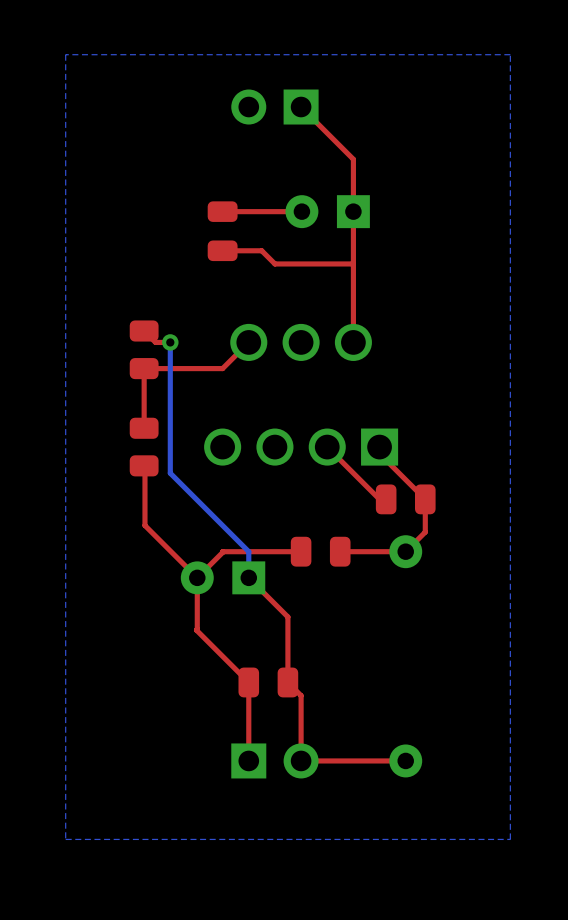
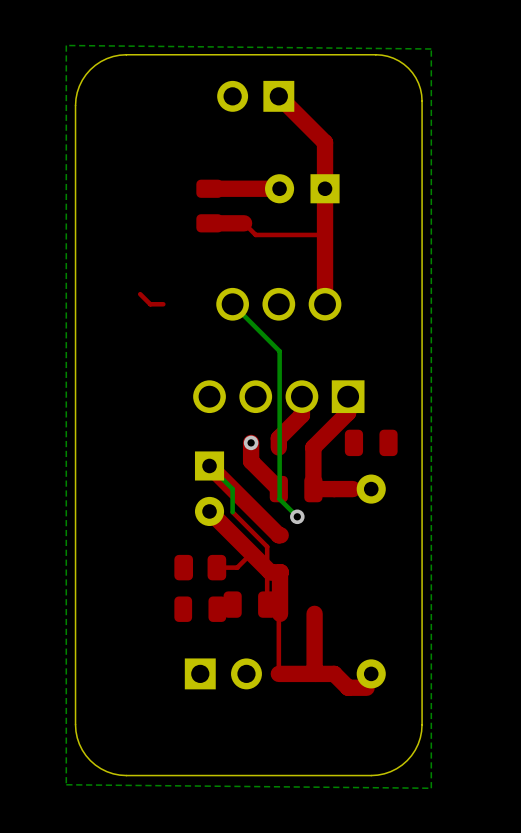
bottom zone outline: (510, 54) (510, 839) (65, 839) (65, 54) (510, 54) -> (66, 45) (431, 48) (431, 788) (66, 784) (66, 45)
board edge: none -> (375, 54) (119, 55) (106, 58) (95, 65) (86, 74) (79, 86) (75, 105) (75, 724) (77, 737) (82, 750) (90, 760) (106, 771) (126, 775) (377, 775) (390, 771) (402, 765) (411, 755) (418, 744) (422, 724) (422, 100) (418, 83) (408, 68) (393, 58) (375, 54)
top track width: thin (301, 107) (353, 159) (353, 342) -> thick (278, 96) (325, 142) (325, 304)
top track width: thin (301, 211) (222, 211) -> thick (279, 188) (209, 188)
top track width: thin (261, 250) (222, 250) -> thick (244, 223) (209, 223)
bottom track: (170, 342) (170, 473) (222, 525) -> none
via: (170, 342) -> none
top track: (248, 342) (222, 368) (144, 368) (144, 428) -> none
bottom track: none -> (232, 304) (279, 351) (279, 499) (297, 516)
part: (144, 349) -> none
part: (144, 447) -> none
top track: (327, 447) (379, 499) (386, 499) -> (301, 396) (301, 415) (278, 438) (278, 447)
top track: (379, 453) (425, 499) (425, 532) (405, 551) (384, 551) -> (348, 402) (348, 412) (313, 447) (313, 489)
top track: (144, 465) (144, 525) (197, 577) -> none
via: none -> (251, 442)
top track: none -> (209, 465) (280, 535)
top track: (301, 551) (222, 551) (197, 577) -> (278, 489) (251, 461) (251, 442)
top track width: thin (384, 551) (340, 551) -> thick (352, 489) (313, 489)
top track: (197, 577) (196, 630) (248, 682) (248, 760) -> none
top track: none -> (209, 511) (270, 572) (280, 572) (280, 613)
part rotation: 0° (223, 577) -> 90° counterclockwise (209, 488)
via: none -> (297, 516)
top track: none -> (251, 553) (237, 567) (216, 567)
part: none -> (200, 567)
part: none -> (200, 609)
top track: none -> (314, 613) (315, 673)
part position: (274, 760) -> (223, 673)
top track width: thin (363, 760) (301, 760) -> thick (334, 673) (278, 673)
top track: (405, 760) (363, 760) -> (366, 687) (348, 687) (334, 673)

